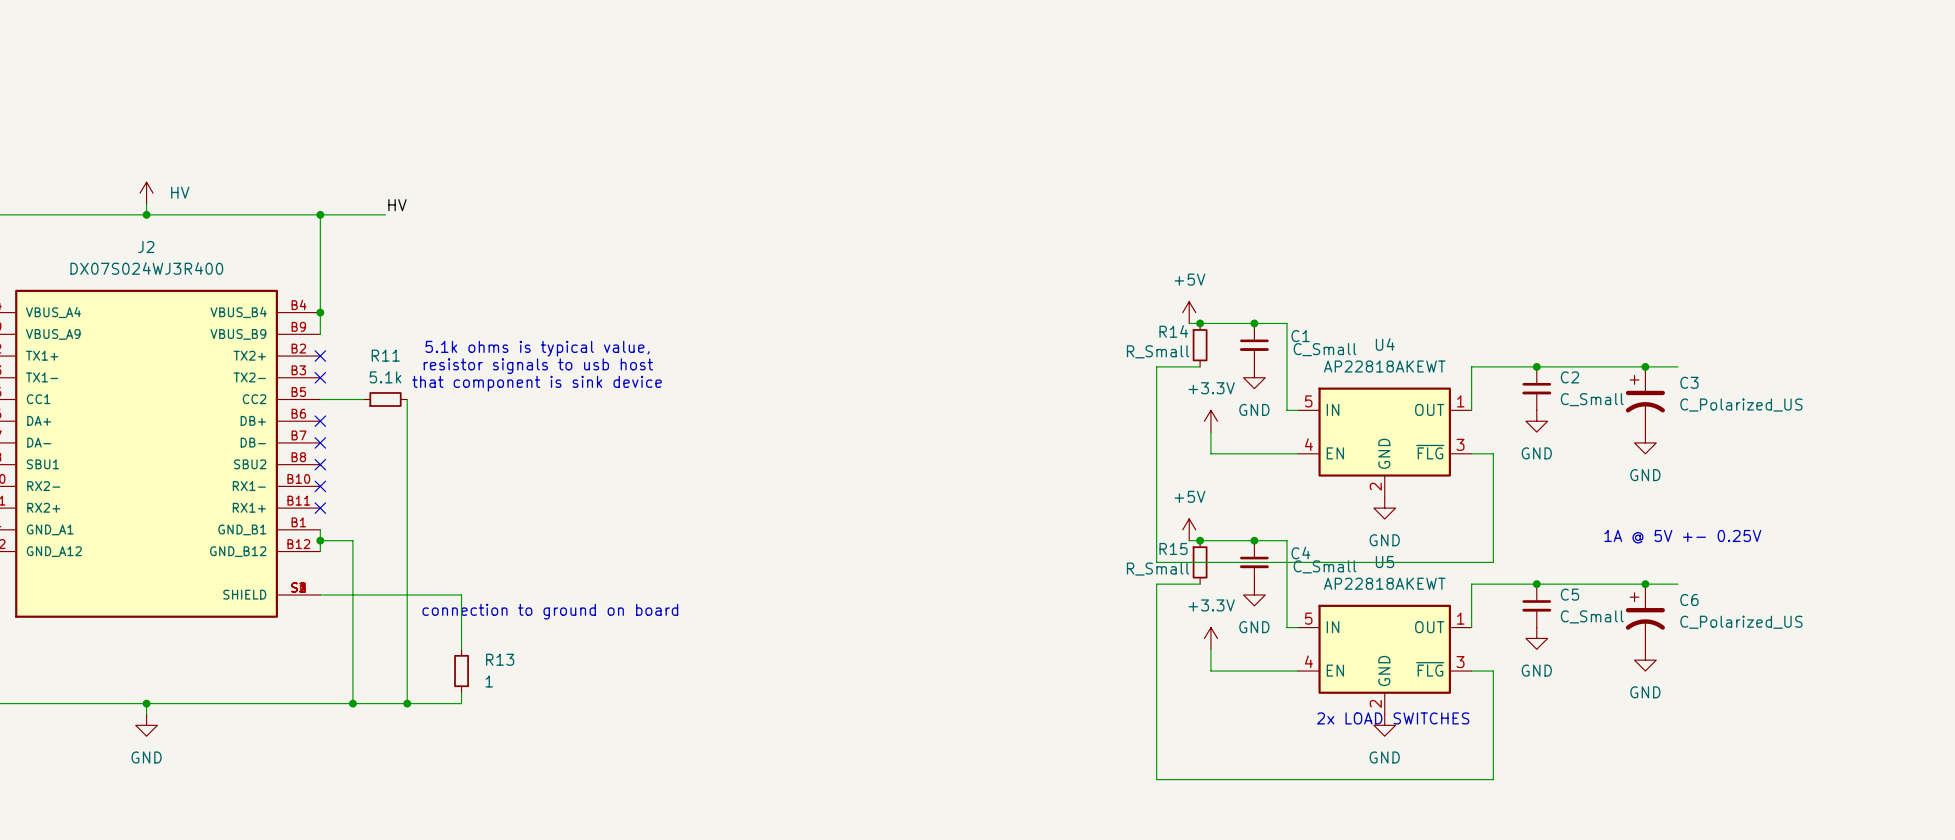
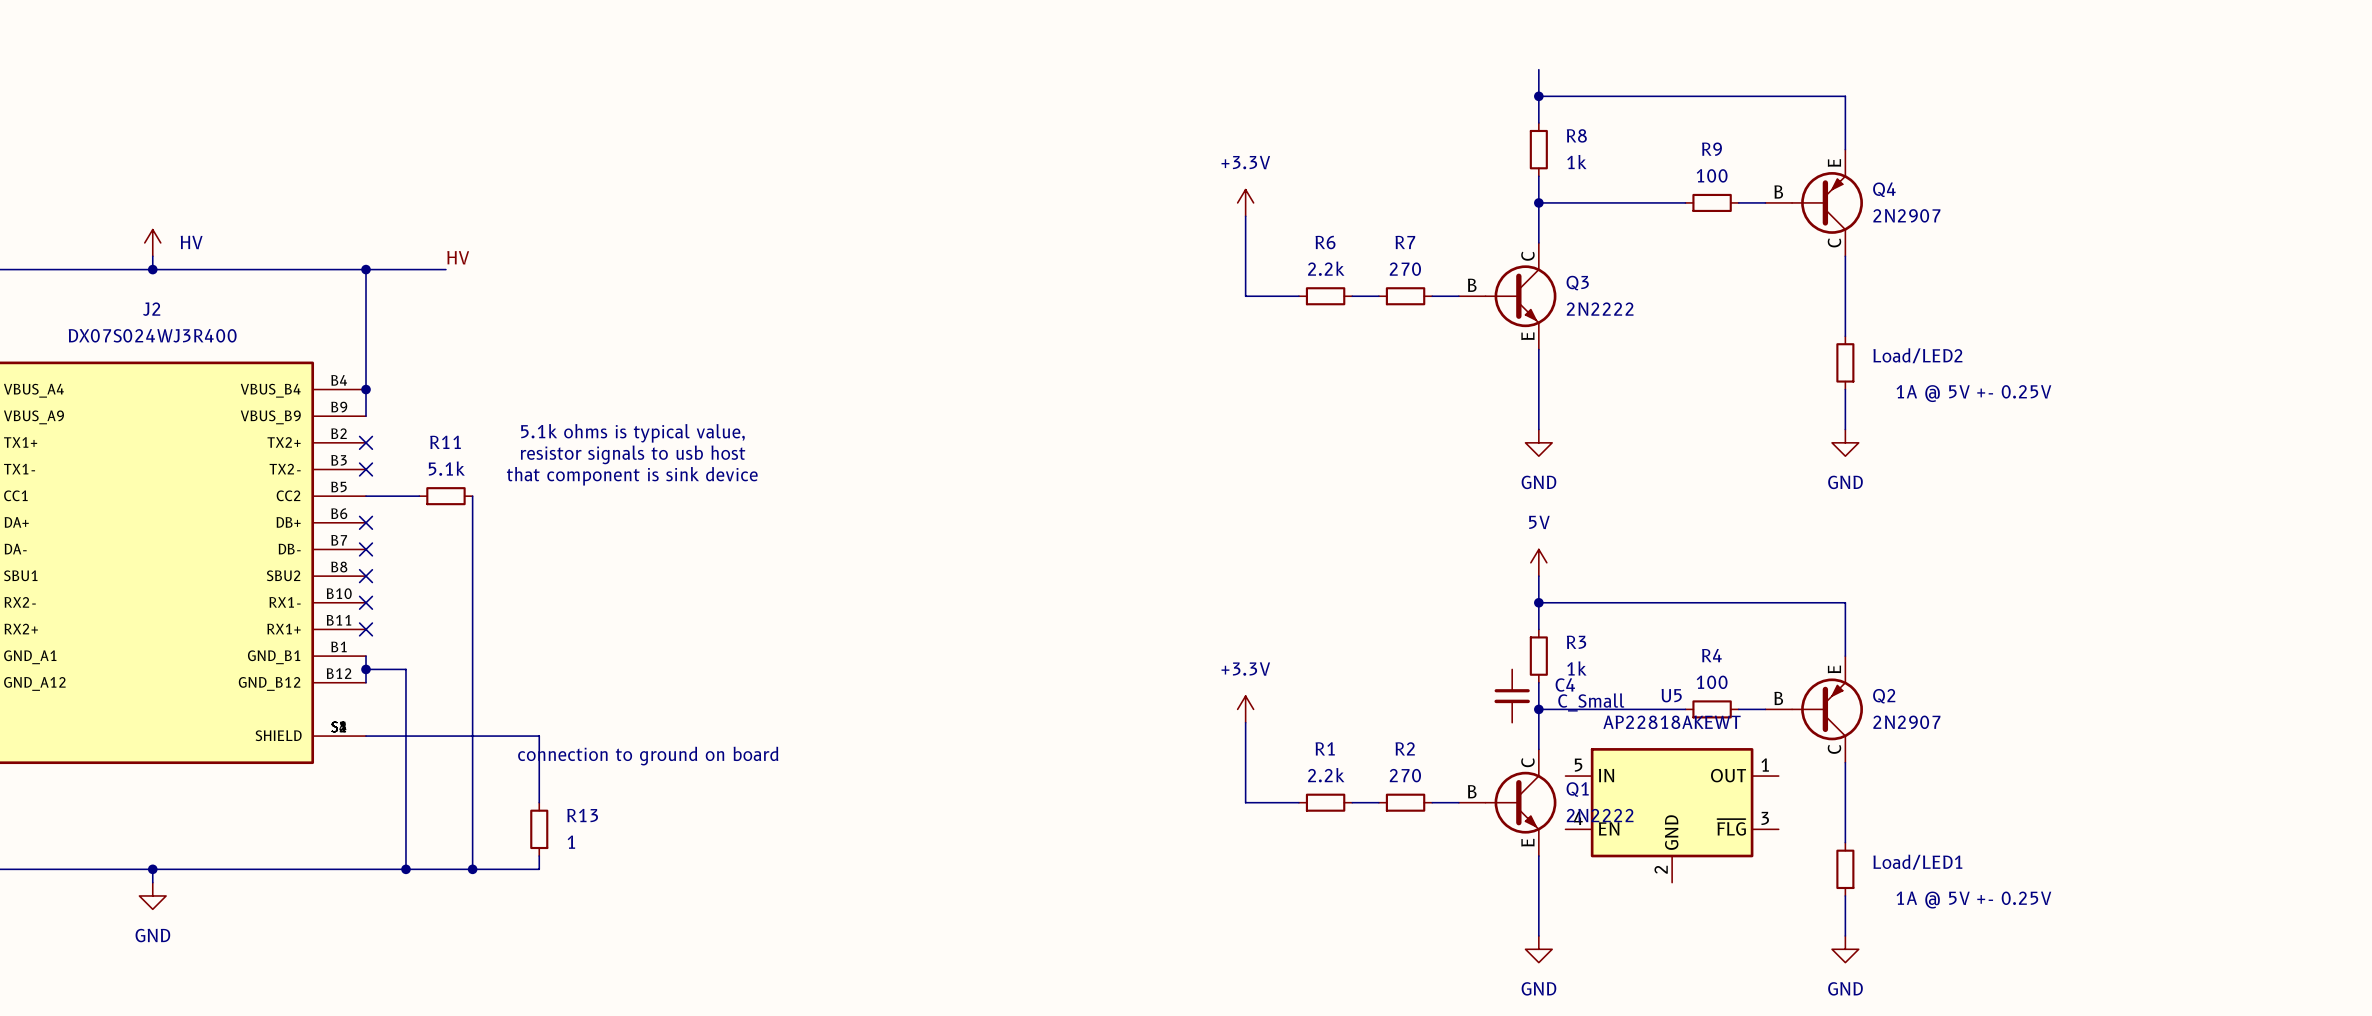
wire: none -> (1538, 69) (1538, 122)
wire: none -> (1538, 96) (1845, 96) (1845, 149)
junction: none -> (1538, 96)
R8: none -> 1k (1538, 149)
wire: none -> (1538, 176) (1538, 242)
power symbol: none -> +3.3V (1245, 202)
wire: none -> (1538, 202) (1685, 202)
junction: none -> (1538, 202)
R9: none -> 100 (1712, 202)
wire: none -> (1738, 202) (1765, 202)
Q4: none -> 2N2907 (1814, 202)
wire: none -> (1245, 216) (1245, 296) (1298, 296)
wire: none -> (1845, 256) (1845, 336)
R6: none -> 2.2k (1325, 296)
wire: none -> (1352, 296) (1378, 296)
R7: none -> 270 (1405, 296)
wire: none -> (1432, 296) (1458, 296)
Q3: none -> 2N2222 (1507, 296)
wire: none -> (1538, 349) (1538, 429)
Load/LED2: none -> (1845, 362)
power symbol: +5V (1189, 312) -> none
wire: none -> (1845, 389) (1845, 429)
text: none -> 1A @ 5V +- 0.25V (1973, 393)
wire: (1189, 323) (1286, 323) (1286, 410) (1297, 410) -> none
junction: (1200, 323) -> none
junction: (1254, 323) -> none
R14: R_Small (1200, 345) -> none
C1: C_Small (1254, 345) -> none
wire: (1200, 366) (1156, 366) (1156, 562) (1493, 562) (1493, 453) (1471, 453) -> none
junction: (1536, 366) -> none
junction: (1645, 366) -> none
wire: (1677, 366) (1471, 366) (1471, 410) -> none
power symbol position: GND (1254, 377) -> GND (1538, 442)
C2: C_Small (1536, 388) -> none
C3: C_Polarized_US (1645, 399) -> none
power symbol: +3.3V (1210, 421) -> none
power symbol position: GND (1536, 421) -> GND (1845, 442)
wire: (1210, 432) (1210, 453) (1297, 453) -> none
U4: AP22818AKEWT (1384, 442) -> none
power symbol: GND (1645, 442) -> none
power symbol: none -> 5V (1538, 562)
wire: none -> (1538, 576) (1538, 629)
wire: none -> (1538, 602) (1845, 602) (1845, 656)
junction: none -> (1538, 602)
power symbol: GND (1384, 508) -> none
power symbol: +5V (1189, 529) -> none
R3: none -> 1k (1538, 656)
text: 1A @ 5V +- 0.25V (1682, 536) -> none
wire: (1189, 540) (1286, 540) (1286, 627) (1297, 627) -> none
junction: (1200, 540) -> none
junction: (1254, 540) -> none
wire: none -> (1538, 682) (1538, 749)
R15: R_Small (1200, 562) -> none
power symbol: none -> +3.3V (1245, 709)
wire: none -> (1538, 709) (1685, 709)
junction: none -> (1538, 709)
R4: none -> 100 (1712, 709)
wire: none -> (1738, 709) (1765, 709)
Q2: none -> 2N2907 (1814, 709)
wire: none -> (1245, 722) (1245, 802) (1298, 802)
wire: (1200, 584) (1156, 584) (1156, 779) (1493, 779) (1493, 671) (1471, 671) -> none
junction: (1536, 584) -> none
junction: (1645, 584) -> none
wire: (1677, 584) (1471, 584) (1471, 627) -> none
power symbol: GND (1254, 594) -> none
C5: C_Small (1536, 605) -> none
wire: none -> (1845, 762) (1845, 842)
C6: C_Polarized_US (1645, 616) -> none
power symbol: +3.3V (1210, 638) -> none
power symbol: GND (1536, 638) -> none
R1: none -> 2.2k (1325, 802)
wire: none -> (1352, 802) (1378, 802)
R2: none -> 270 (1405, 802)
wire: (1210, 649) (1210, 671) (1297, 671) -> (1458, 802) (1432, 802)
Q1: none -> 2N2222 (1507, 802)
power symbol: GND (1645, 660) -> none
wire: none -> (1538, 856) (1538, 935)
Load/LED1: none -> (1845, 869)
text: 2x LOAD SWITCHES (1393, 718) -> none
power symbol: GND (1384, 725) -> none
wire: none -> (1845, 895) (1845, 935)
text: none -> 1A @ 5V +- 0.25V (1973, 900)
power symbol: none -> GND (1538, 949)
power symbol: none -> GND (1845, 949)

